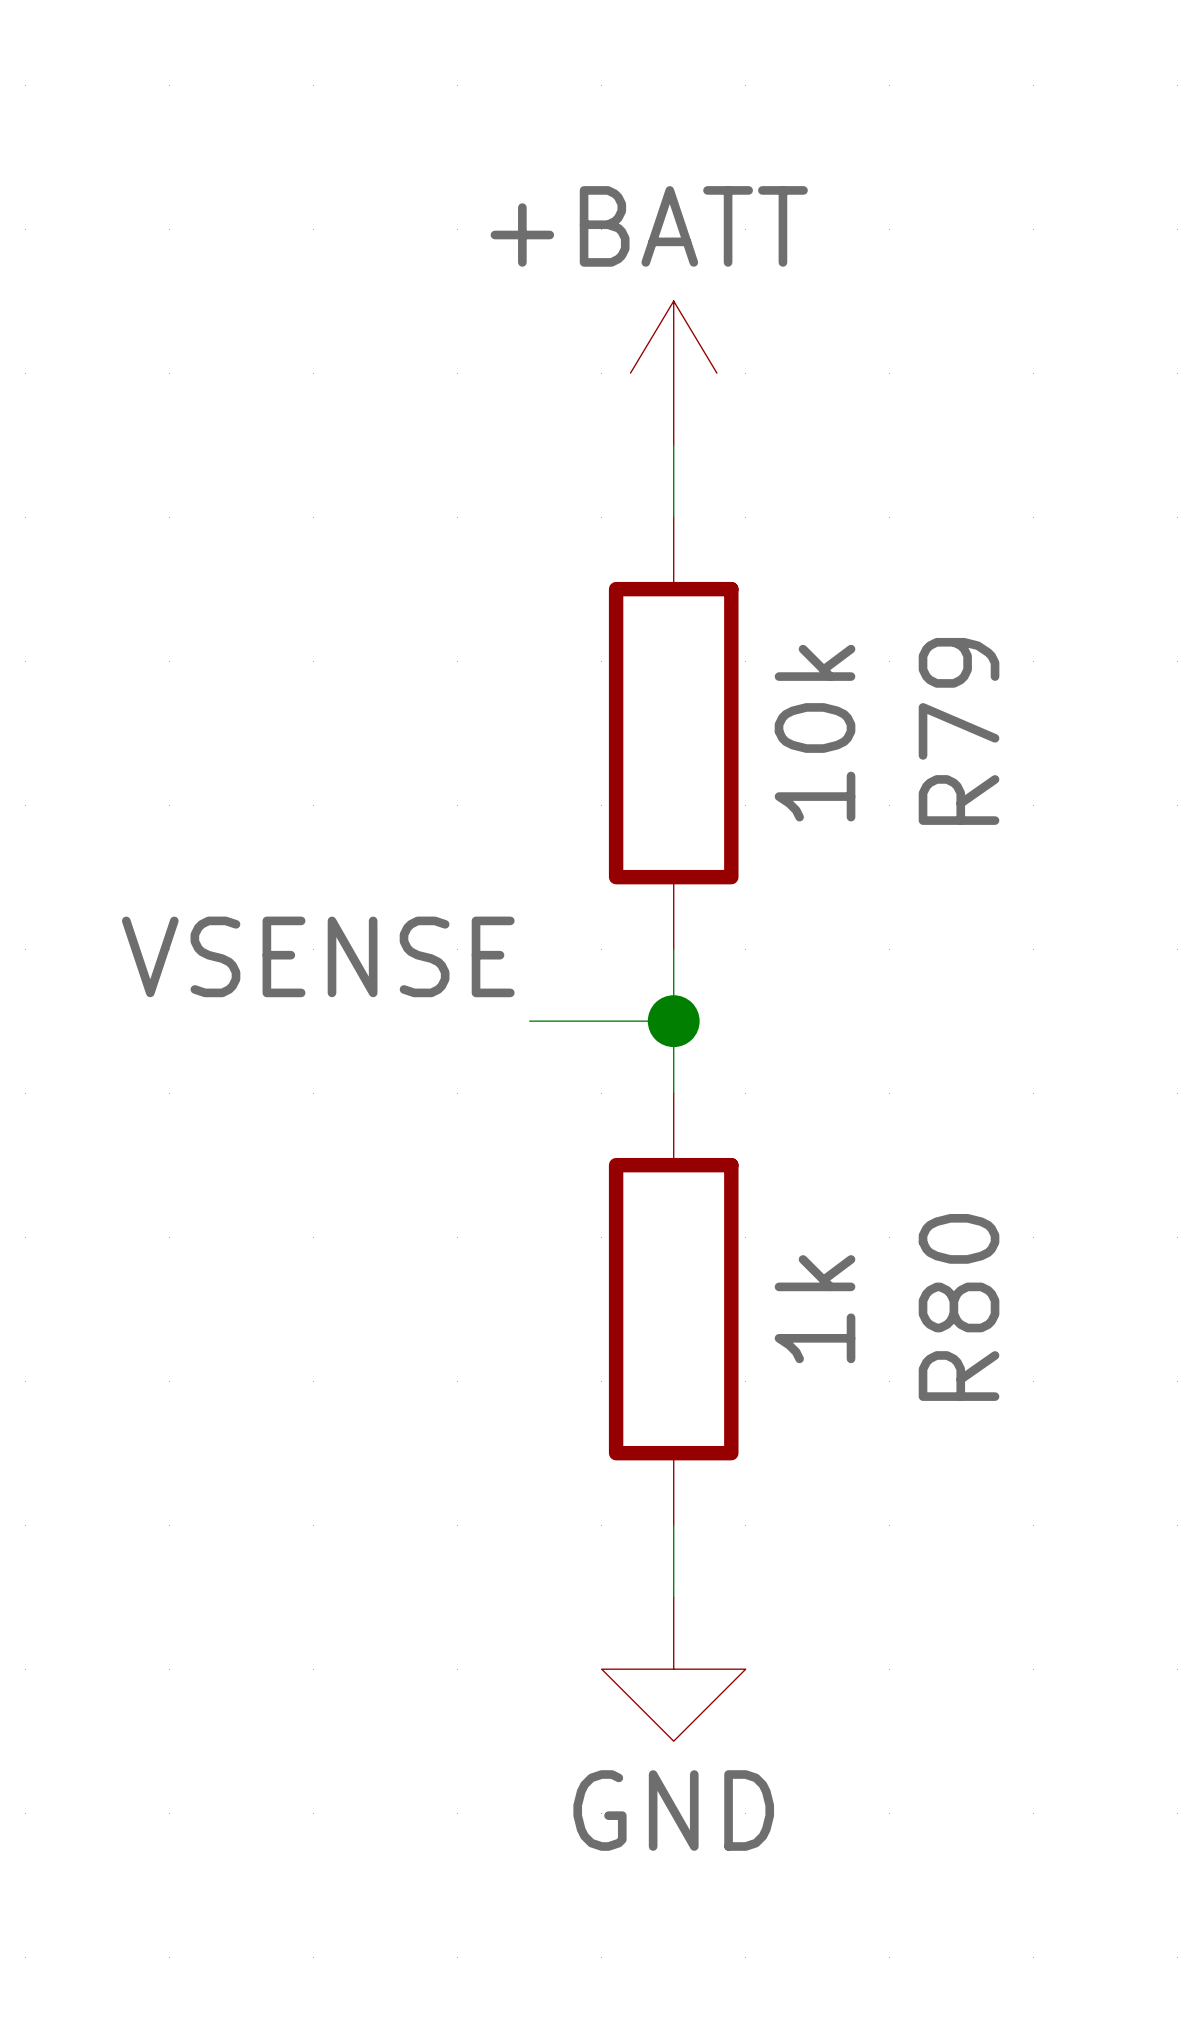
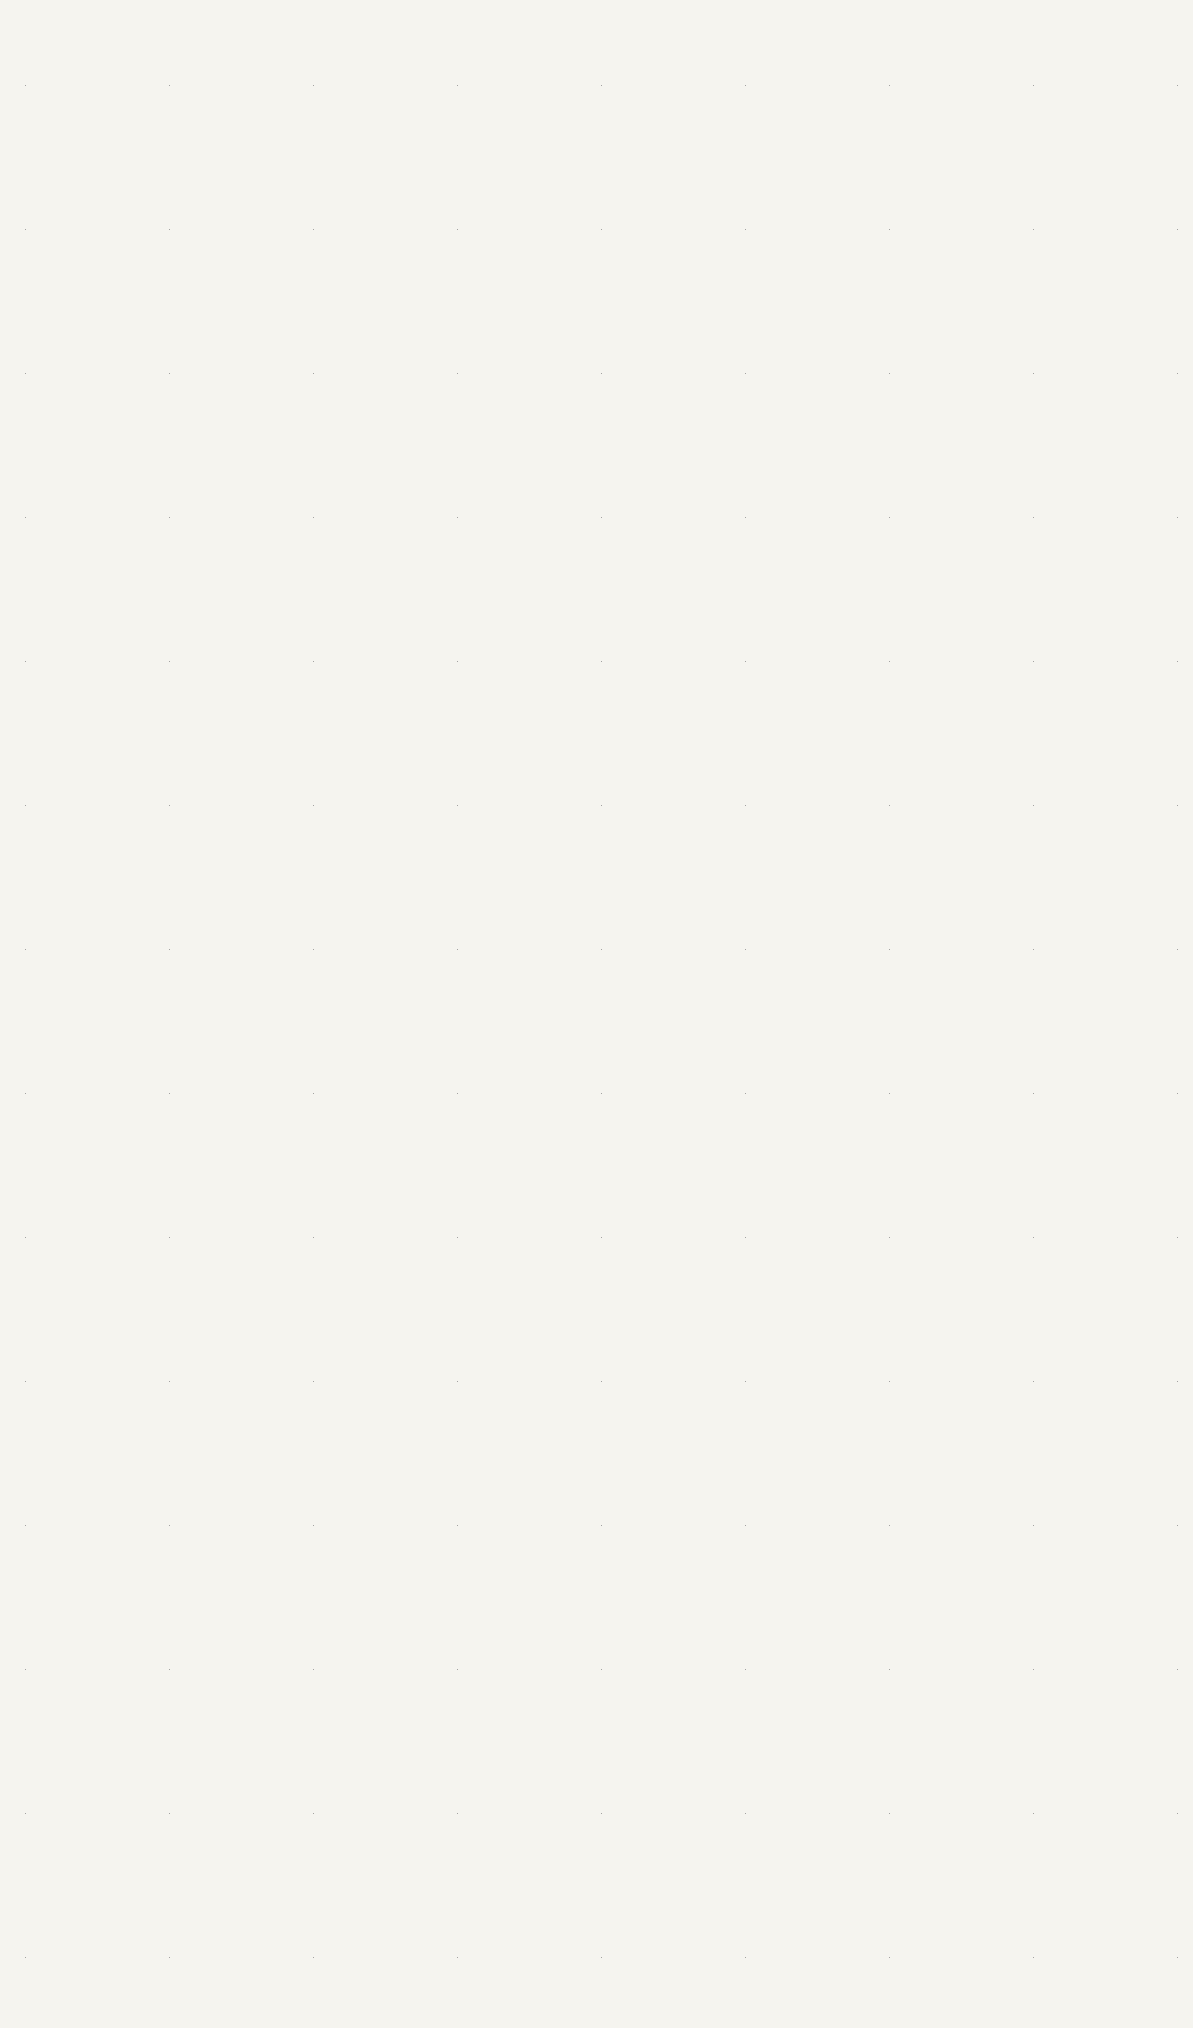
power symbol: +BATT (673, 373) -> none
wire: (673, 445) (673, 517) -> none
R79: 10k (673, 733) -> none
wire: (673, 949) (673, 1093) -> none
label: VSENSE (318, 956) -> none
wire: (529, 1021) (673, 1021) -> none
junction: (673, 1021) -> none
R80: 1k (673, 1309) -> none
wire: (673, 1525) (673, 1597) -> none
power symbol: GND (673, 1669) -> none

